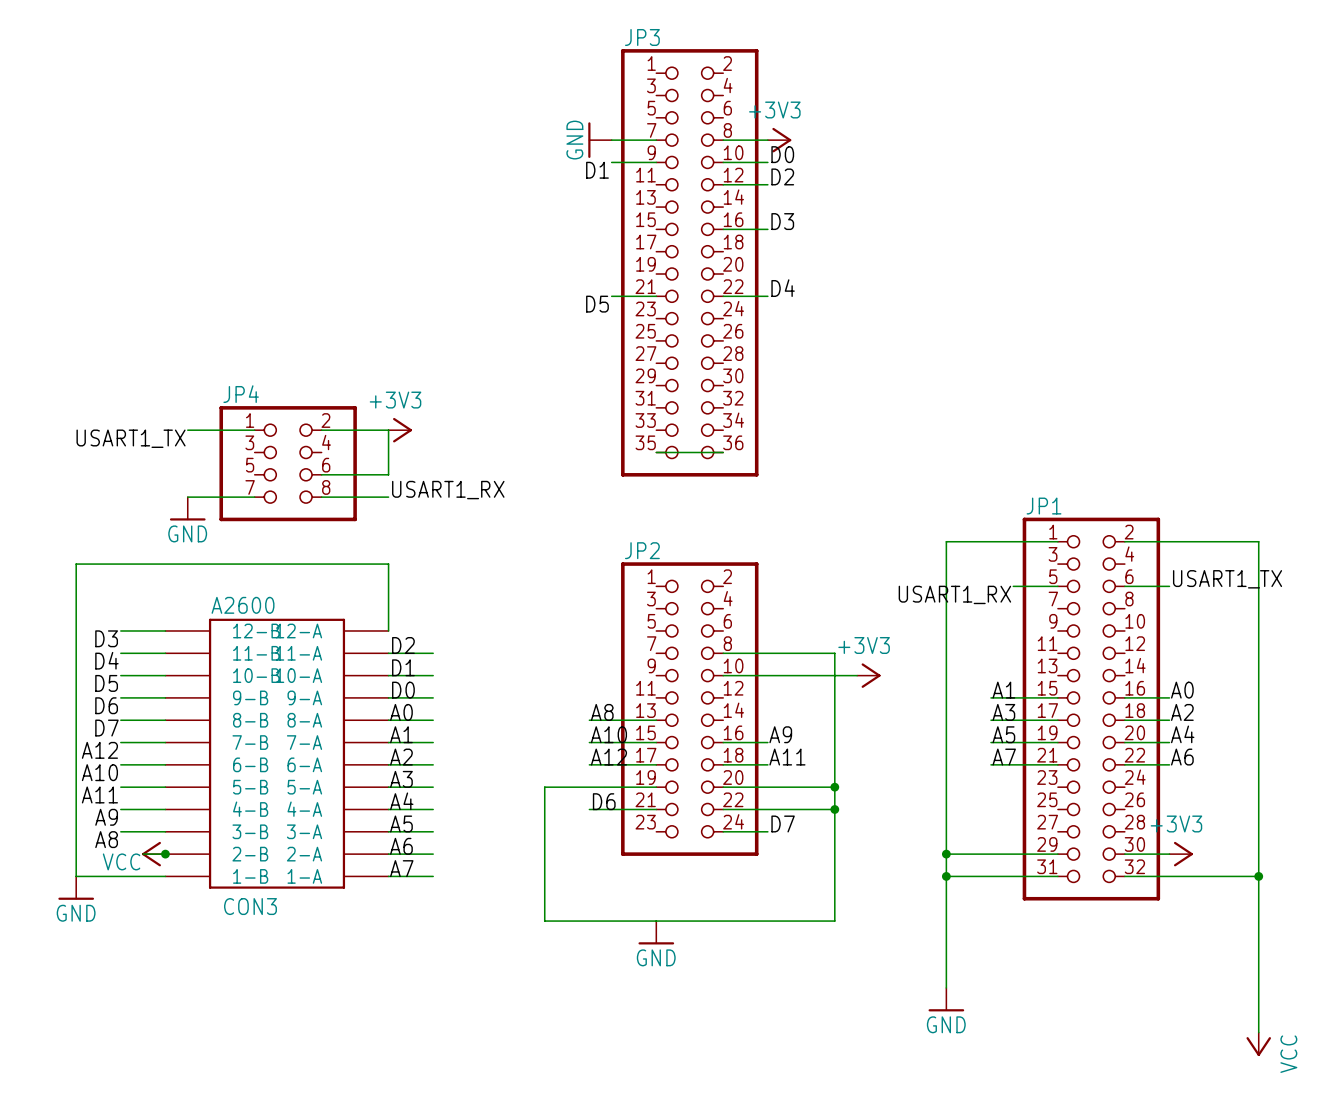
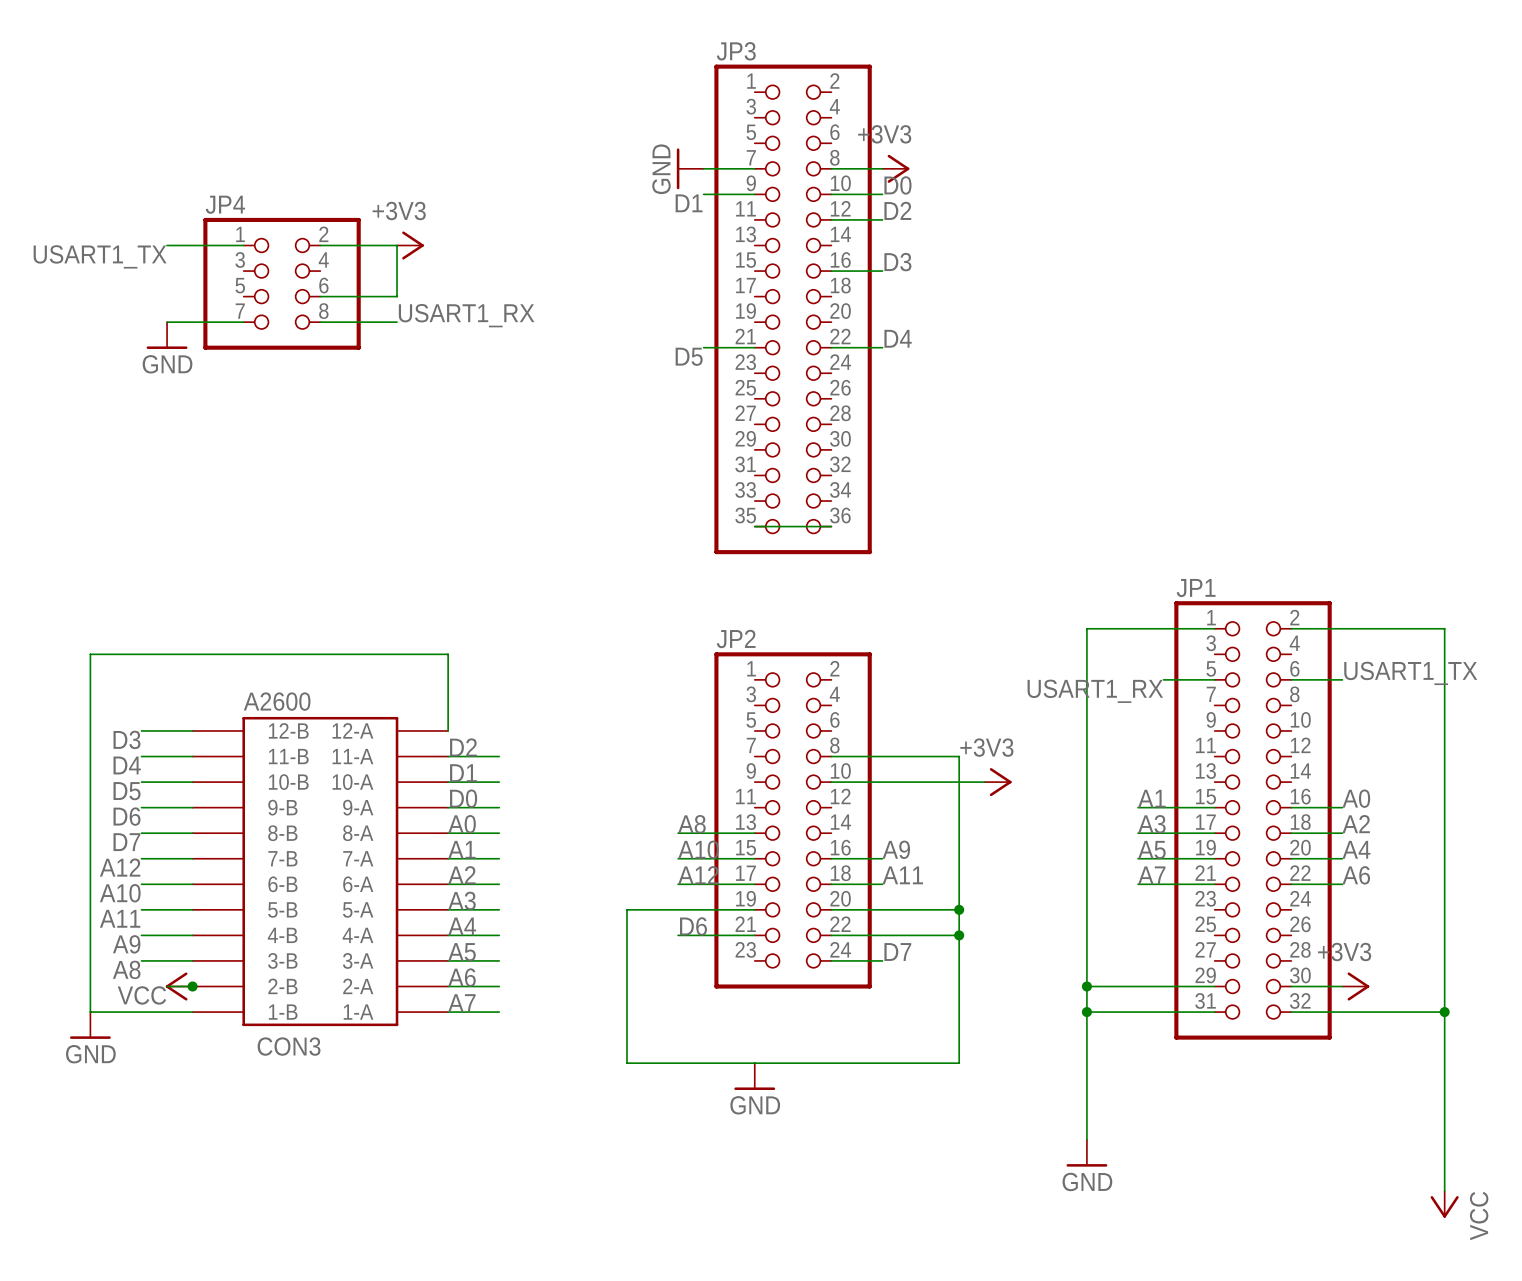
wire: none -> (167, 245) (243, 245)
wire: none -> (320, 245) (397, 245) (397, 296) (320, 296)
power symbol: none -> +3V3 (410, 245)
label: none -> USART1_TX (100, 256)
label: none -> USART1_RX (466, 315)
wire: none -> (320, 322) (397, 322)
power symbol: none -> GND (167, 335)
wire: (187, 430) (254, 430) -> (167, 322) (243, 322)
wire: (321, 430) (388, 430) (388, 474) (321, 474) -> none
power symbol: +3V3 (400, 430) -> none
label: USART1_TX (131, 438) -> none
JP4 position: (288, 463) -> (282, 283)
label: USART1_RX (448, 490) -> none
wire: (187, 497) (254, 497) -> none
wire: (321, 497) (388, 497) -> none
power symbol: GND (187, 508) -> none

